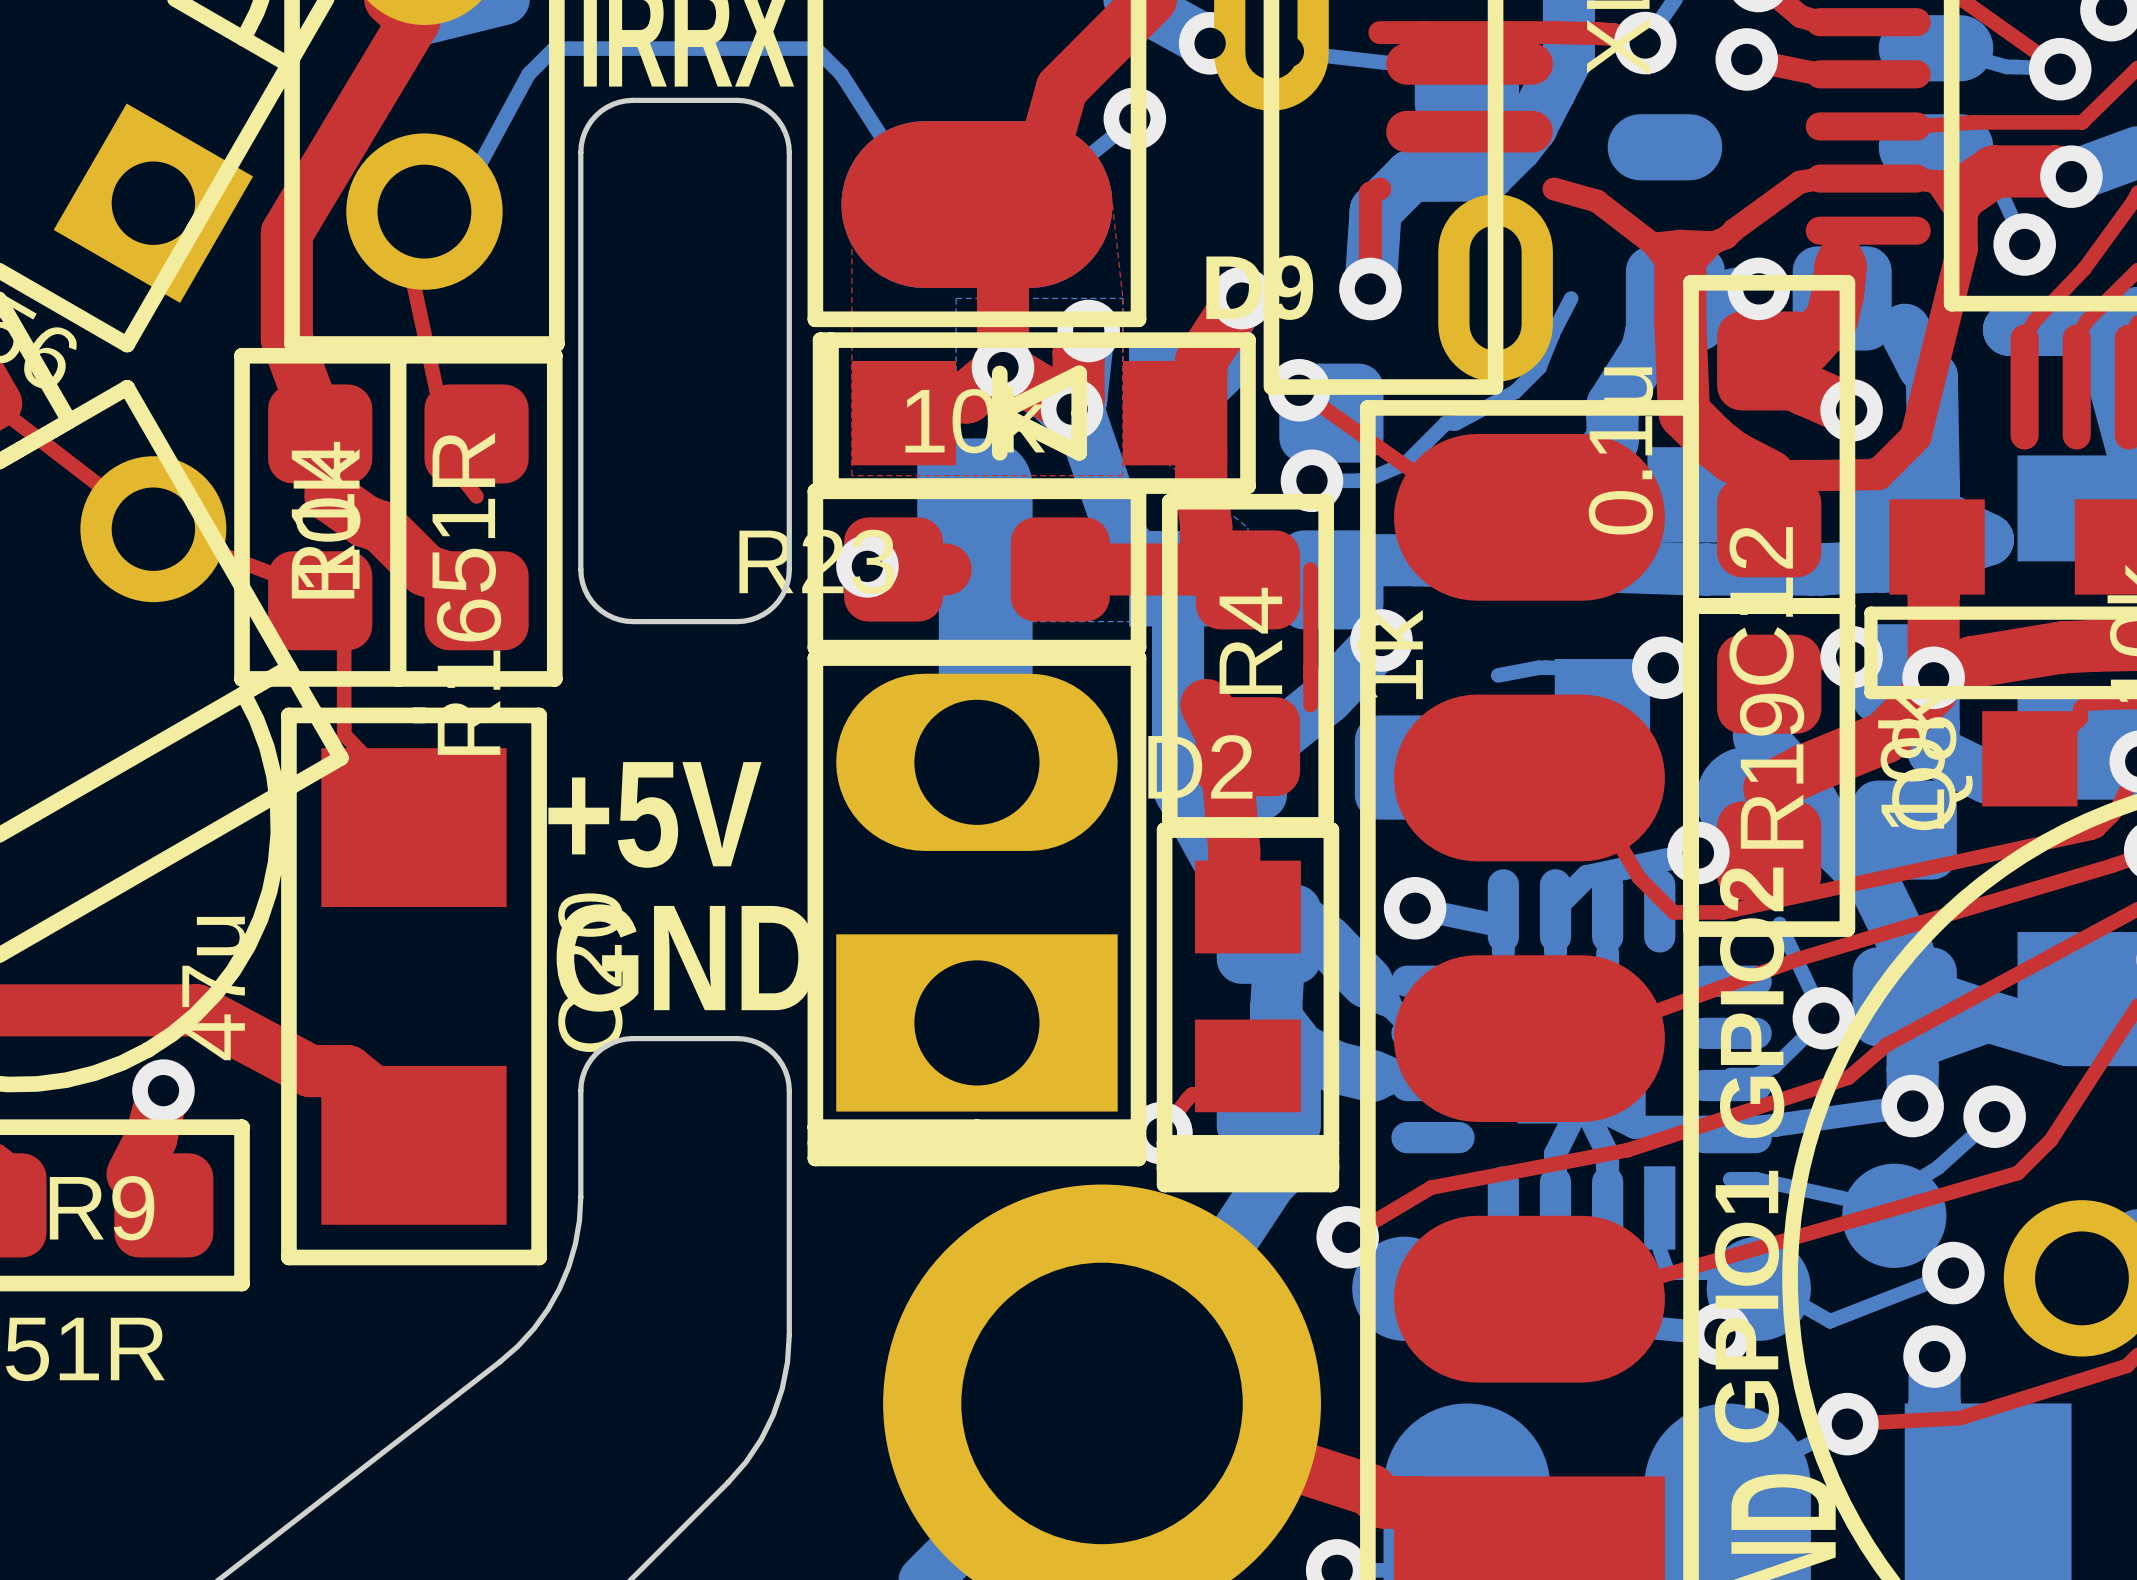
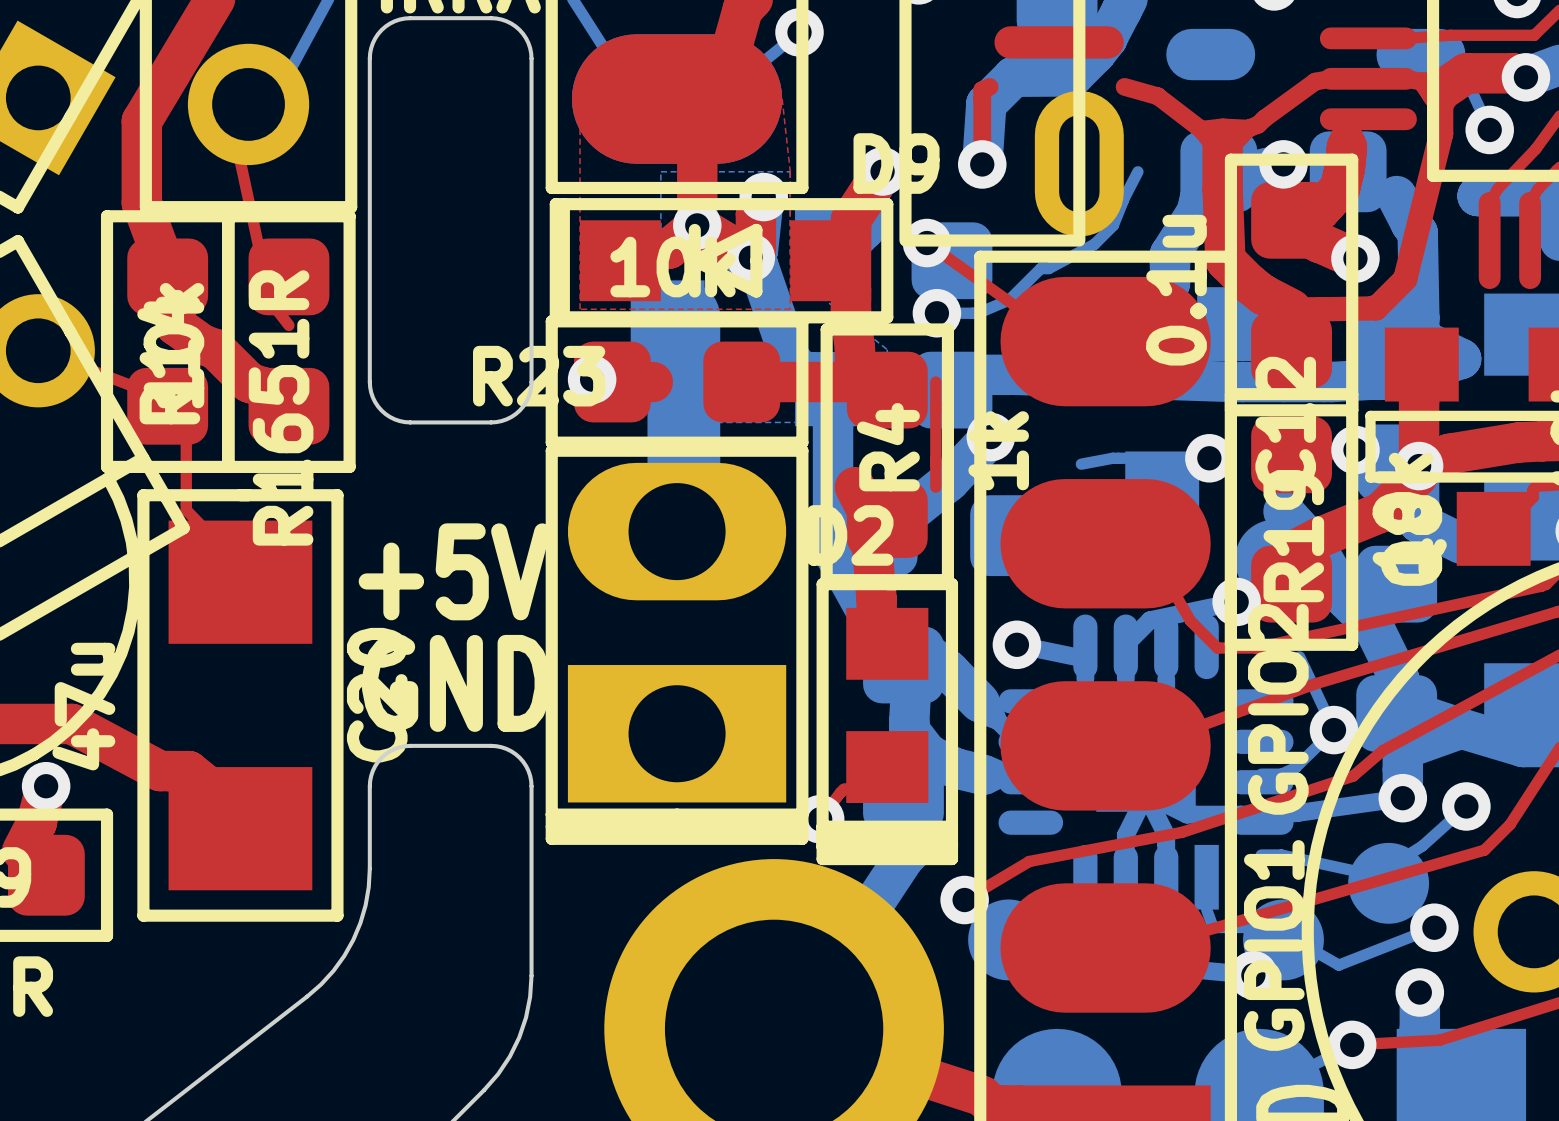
R19 position: (1769, 767) -> (1291, 519)

